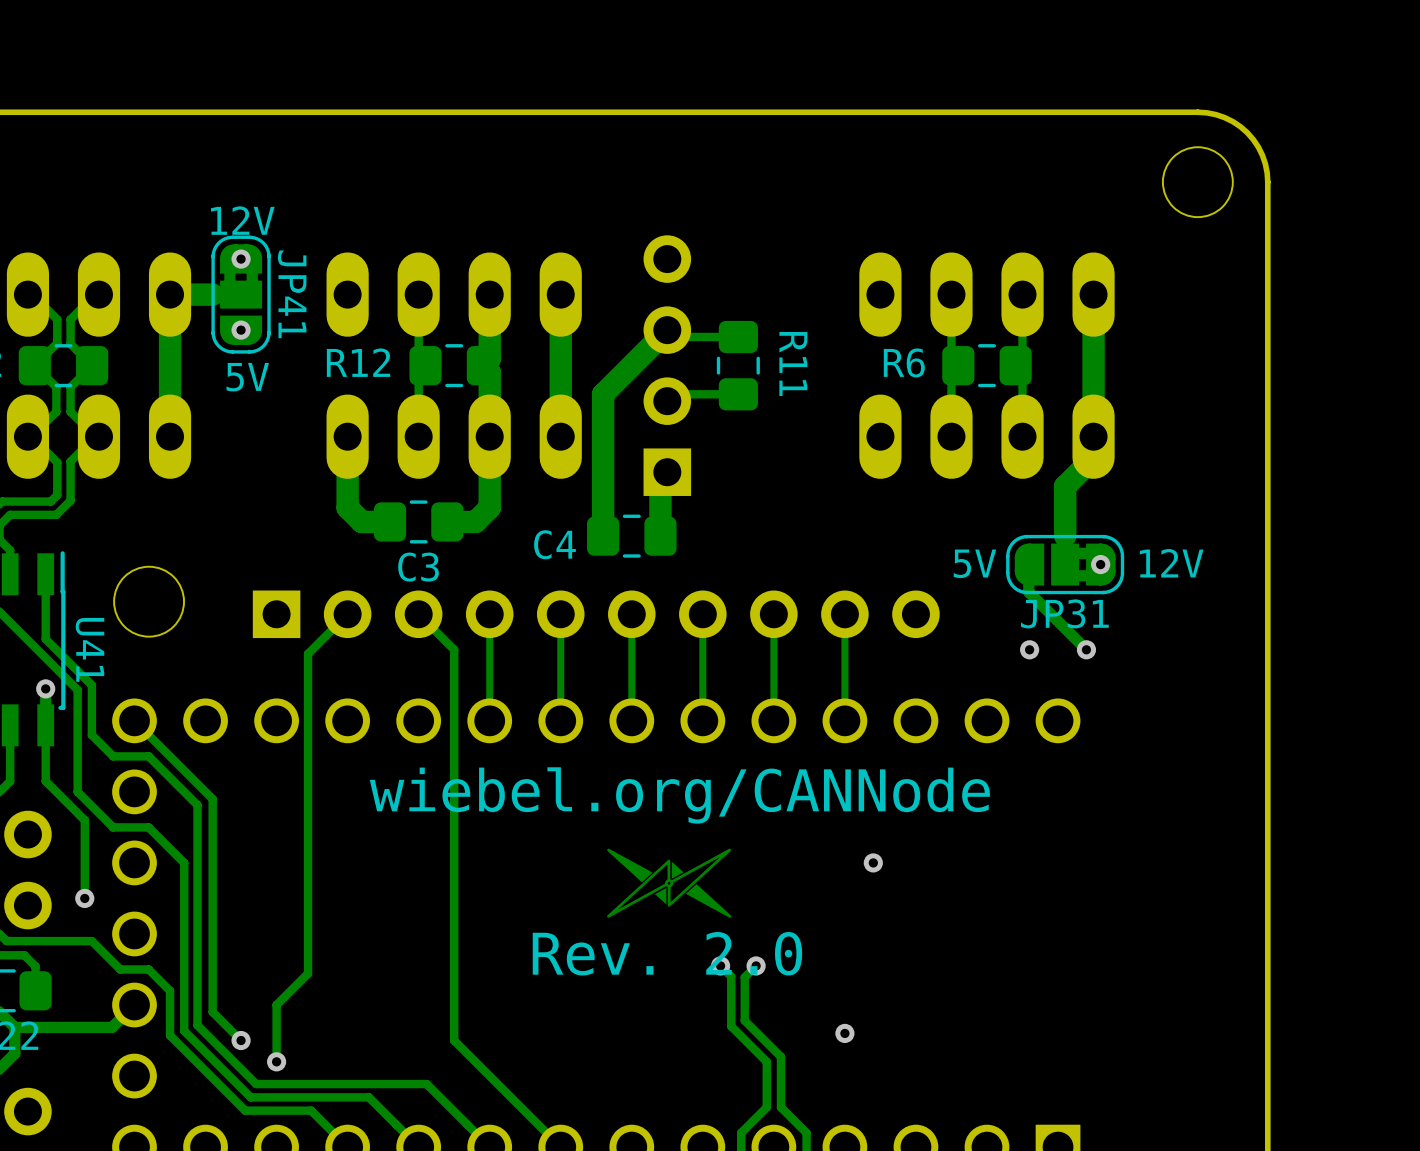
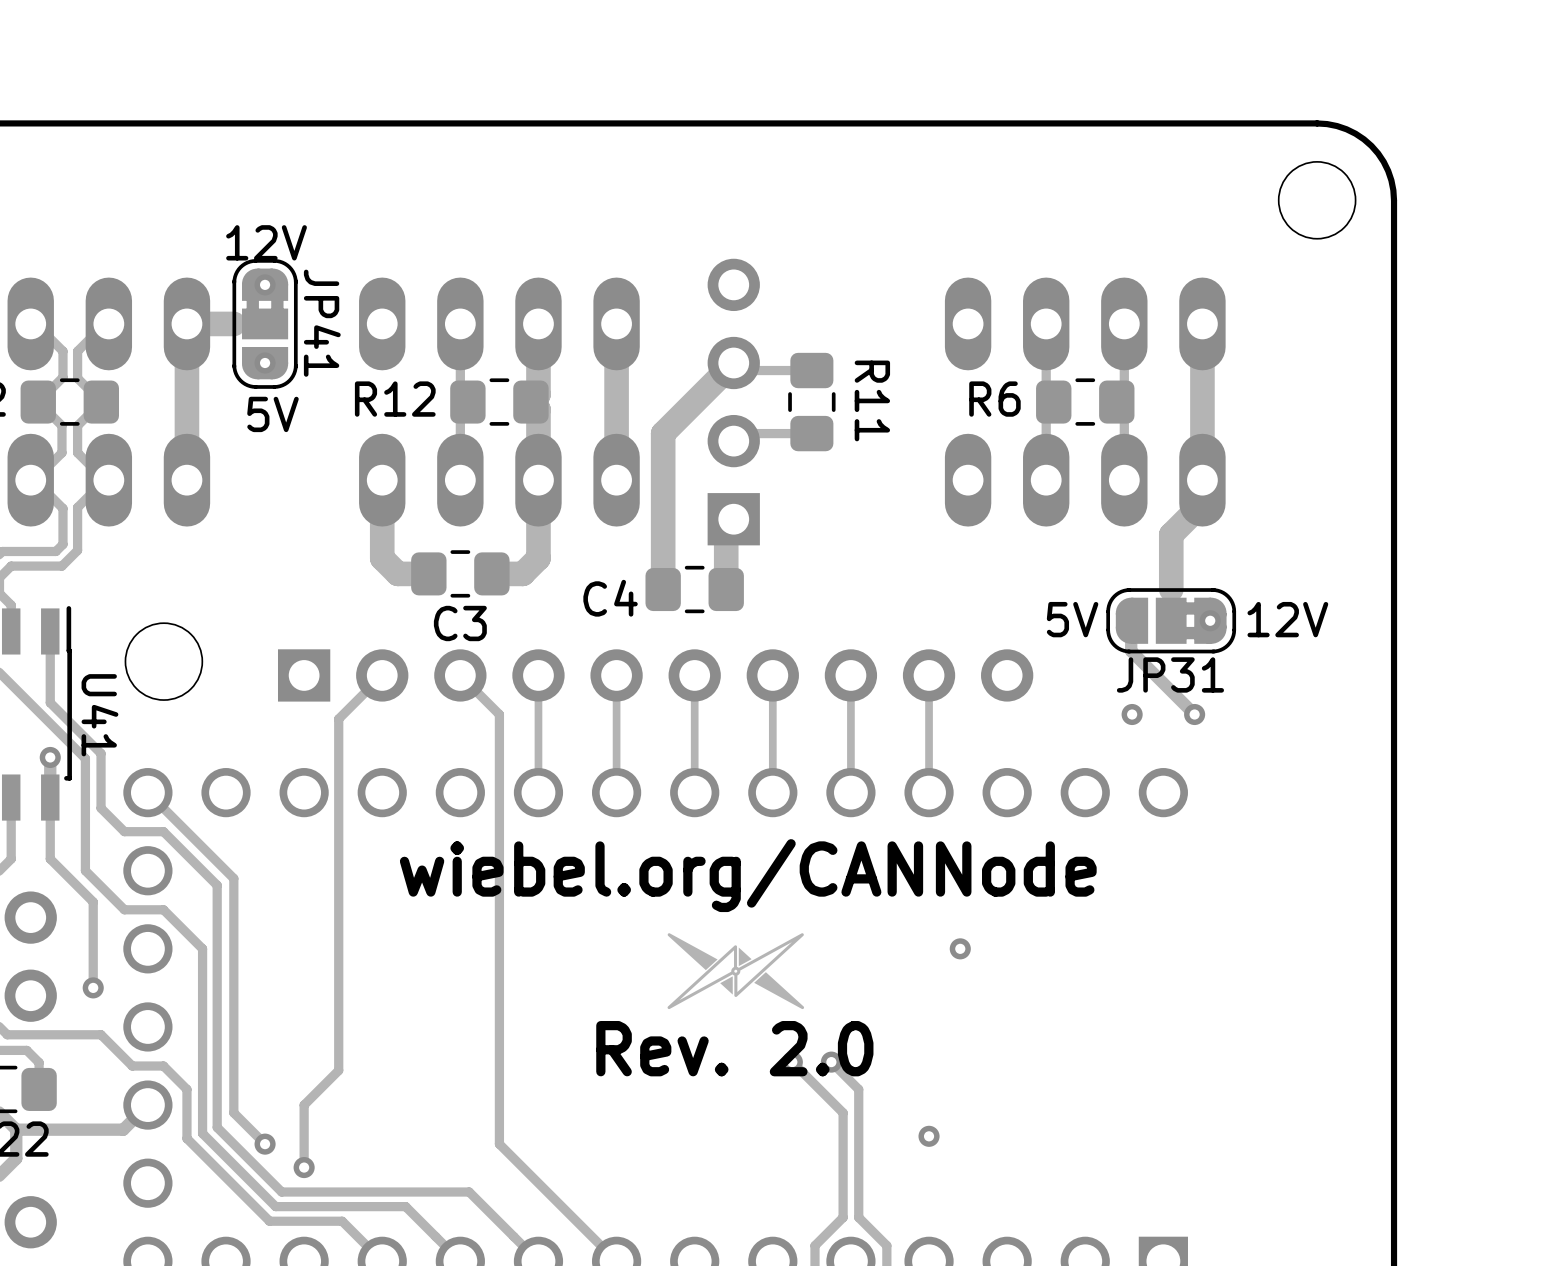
track: (756, 965) (744, 977) (744, 1020) (780, 1056) -> (831, 1062) (858, 1089) (858, 1162)
track: (731, 976) (731, 1026) (766, 1061) -> (804, 1073) (843, 1112) (843, 1167)

